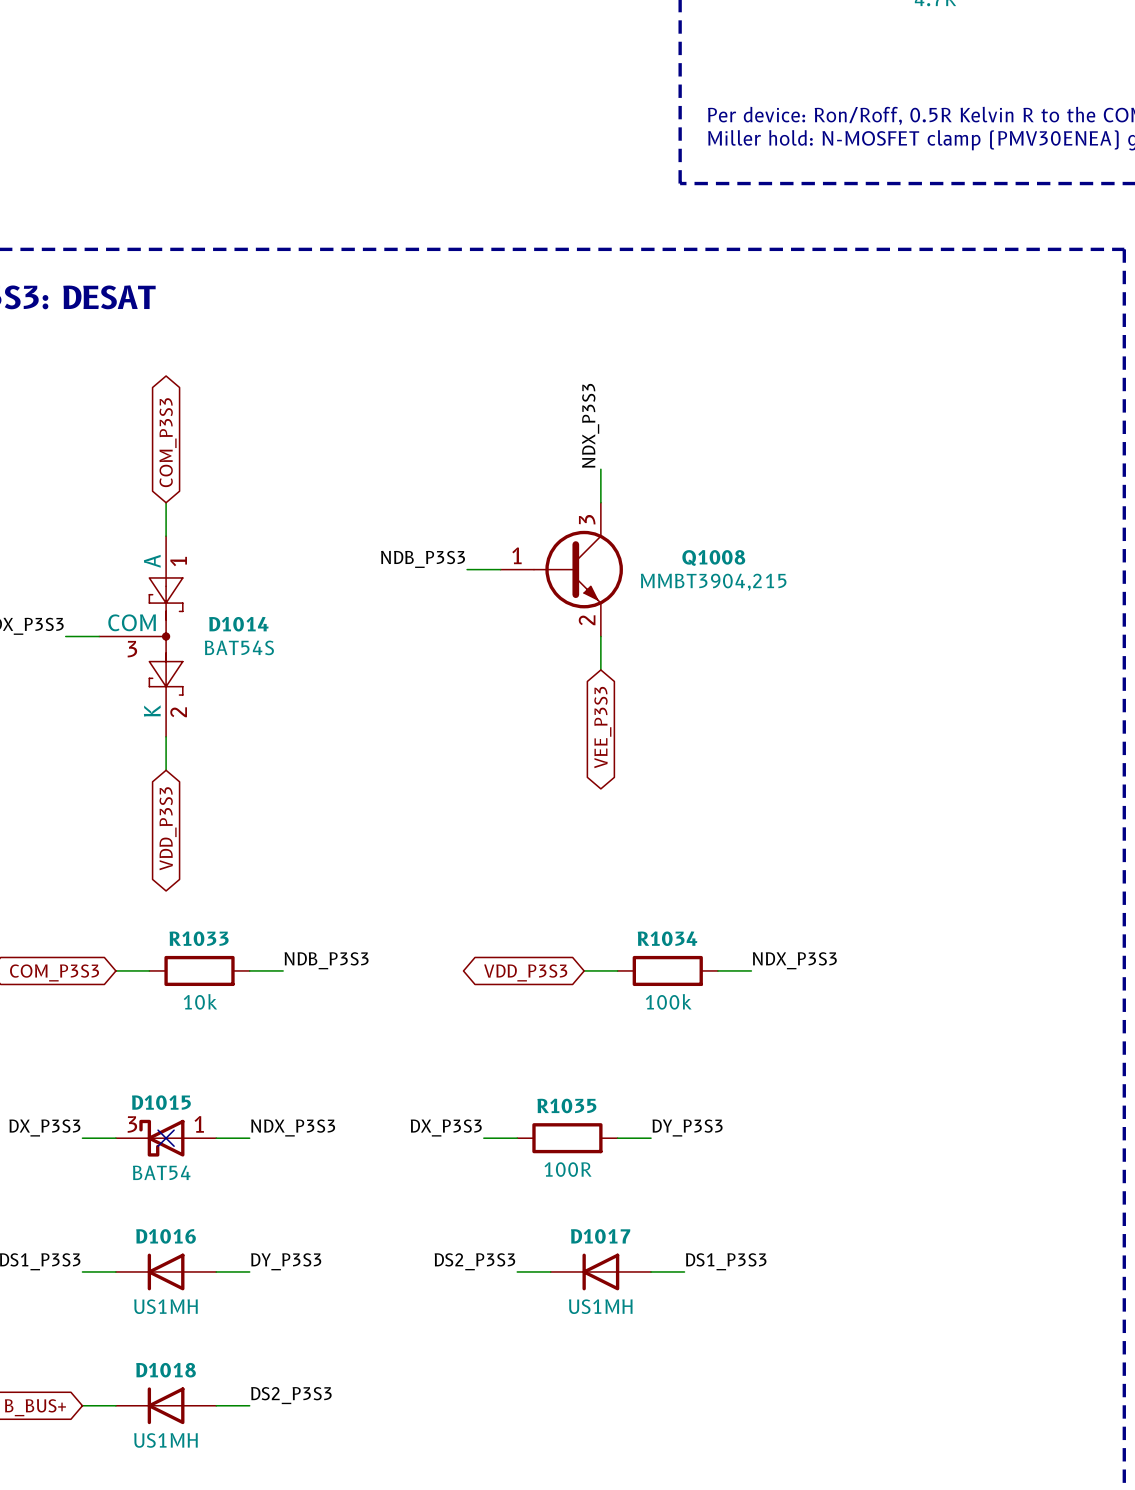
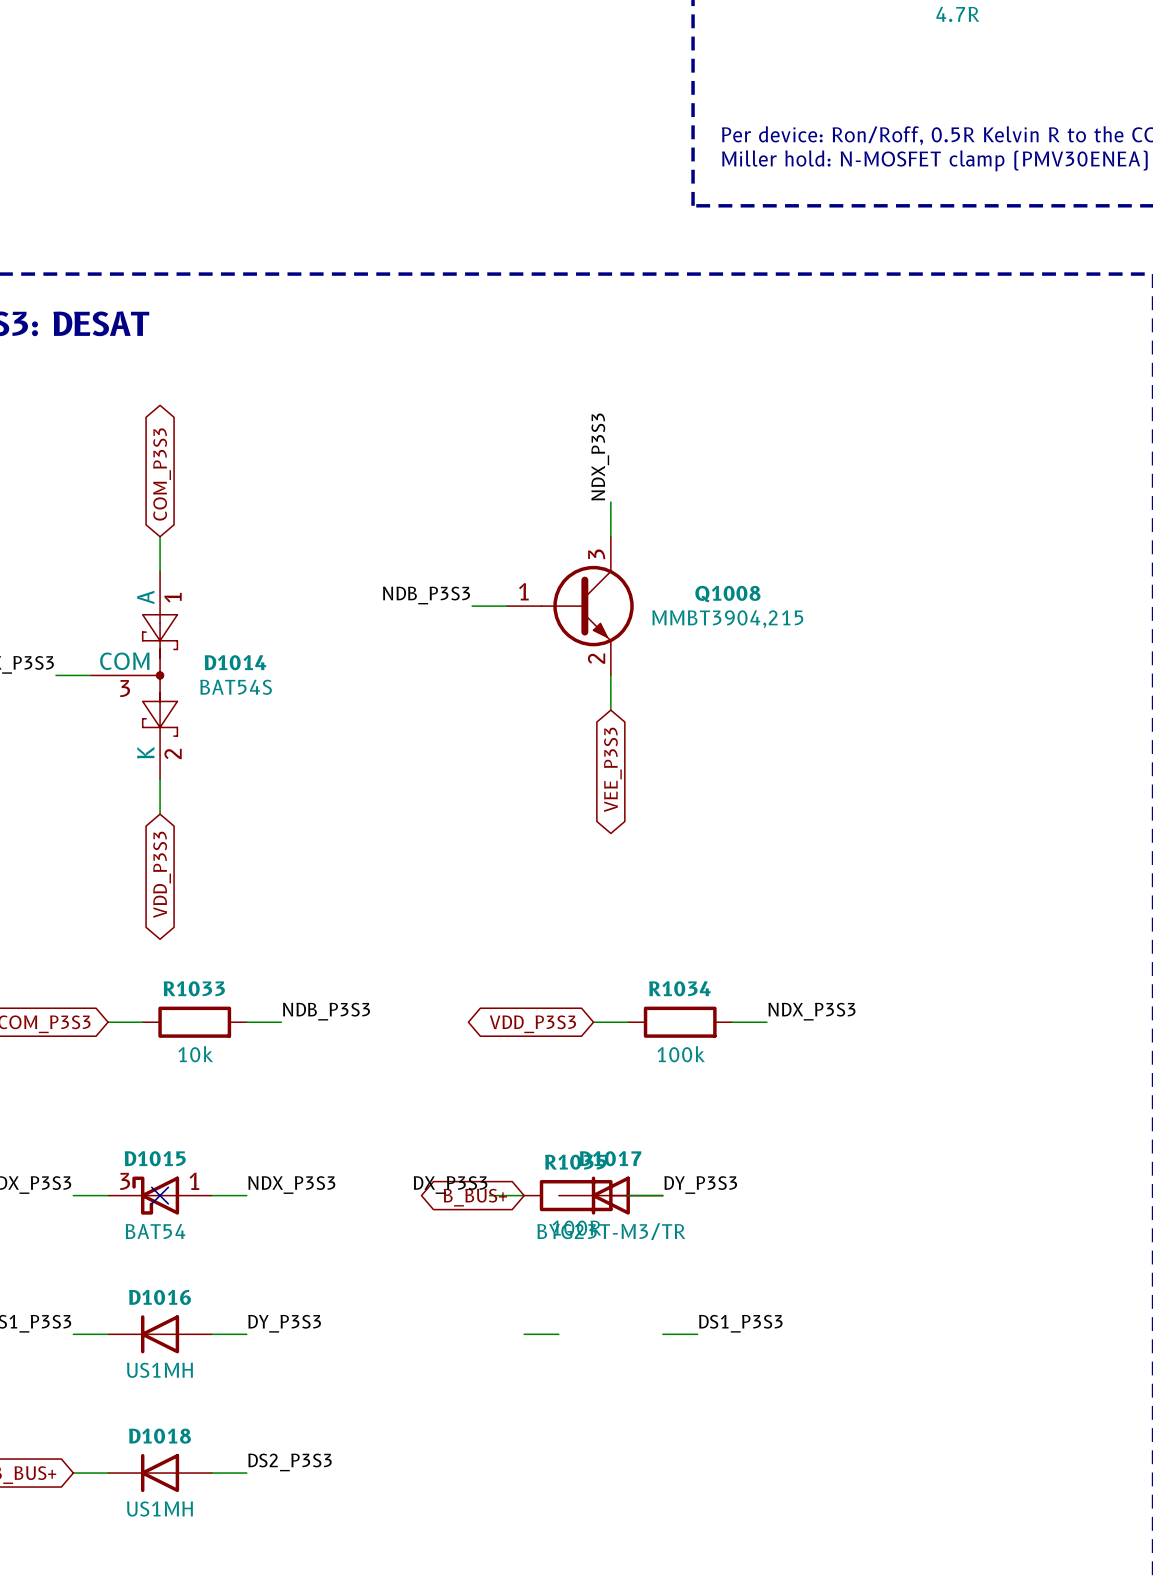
global label: none -> B_BUS+ (475, 1197)
label: DS2_P3S3 (474, 1261) -> none
D1017 position: (600, 1271) -> (610, 1195)
D1017 value: US1MH (600, 1306) -> BYG23T-M3/TR (611, 1231)

